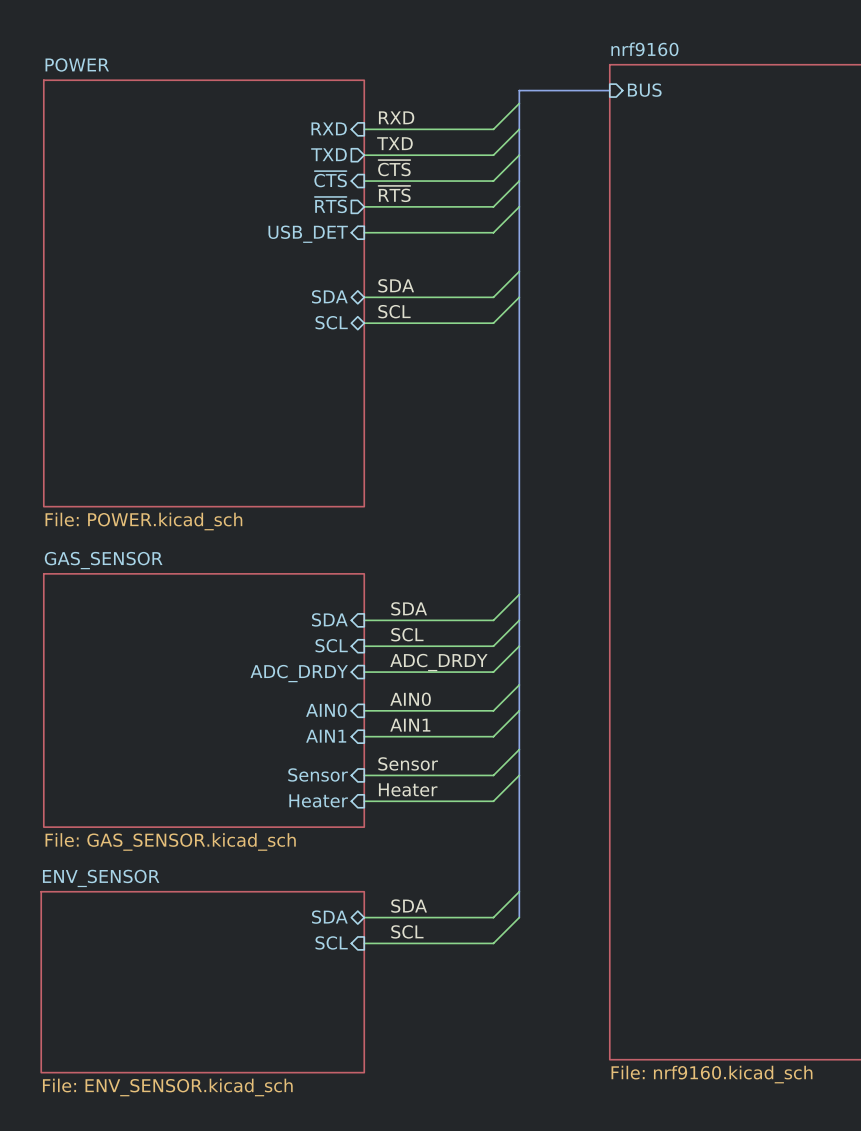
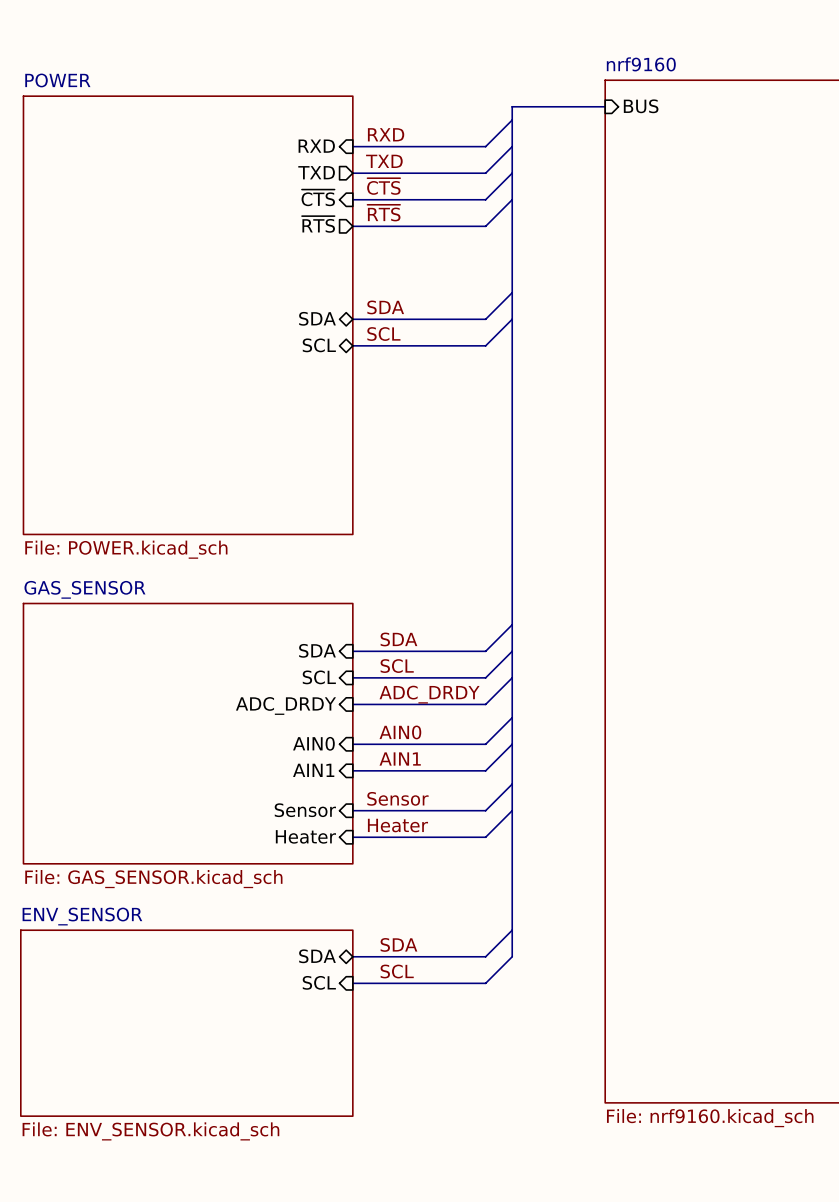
wire: (519, 206) (493, 232) (364, 232) -> none
sheet pin: USB_DET (308, 234) -> none

